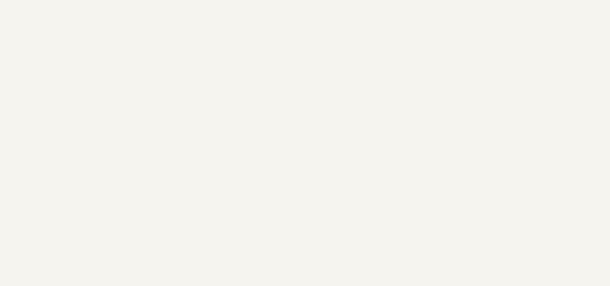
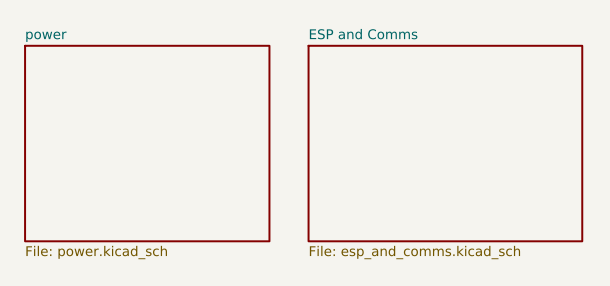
sheet power: none -> File: power.kicad_sch (147, 143)
sheet ESP and Comms: none -> File: esp_and_comms.kicad_sch (445, 143)

